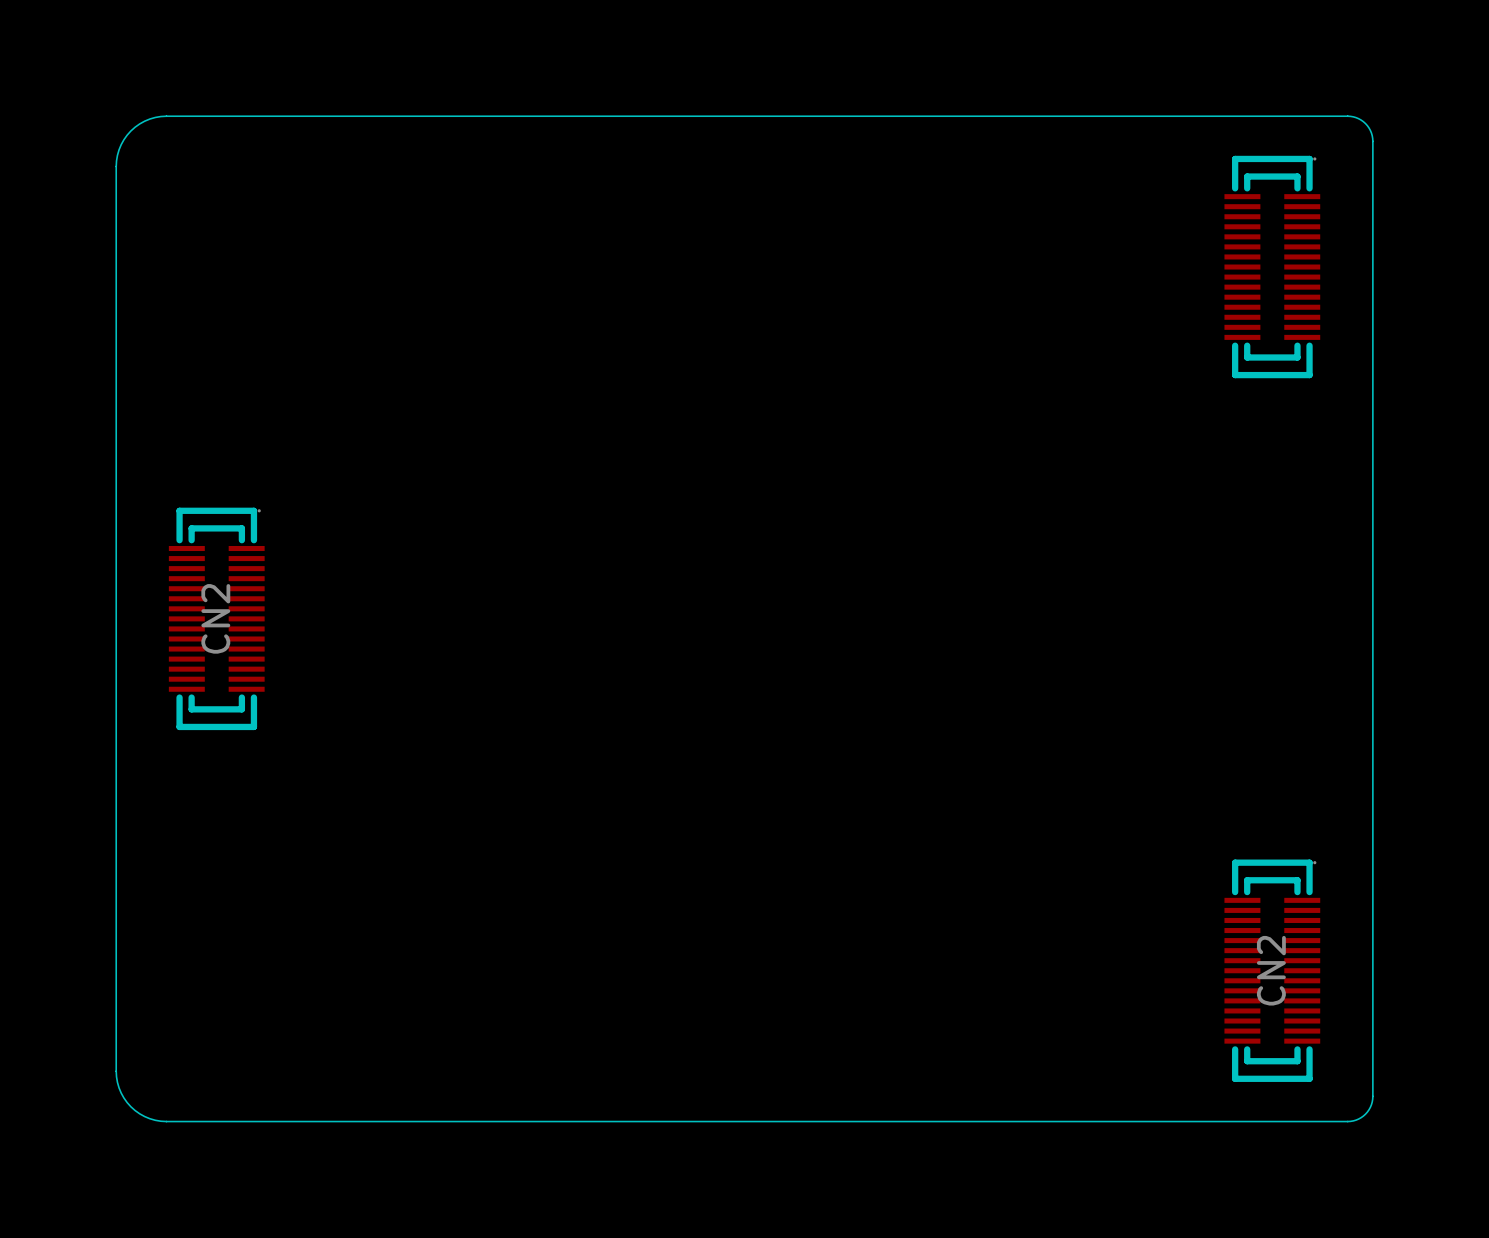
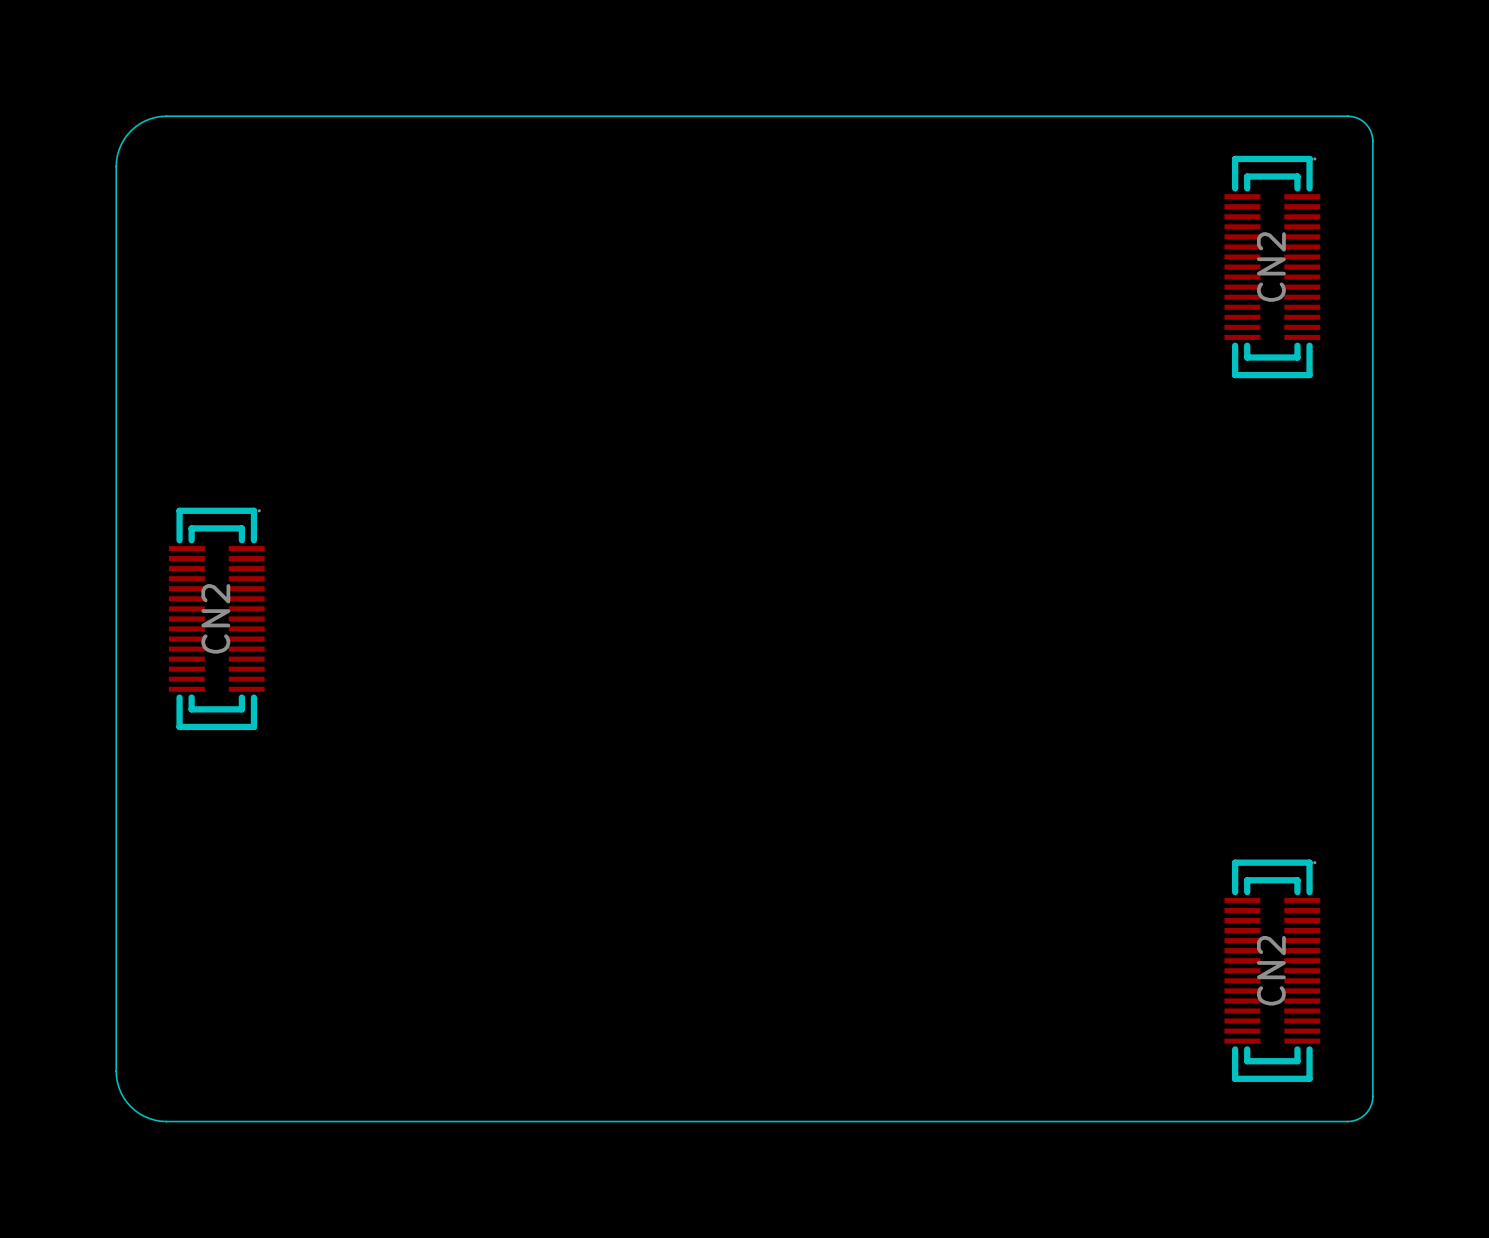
CN2 name: none -> CN2 (1271, 267)

